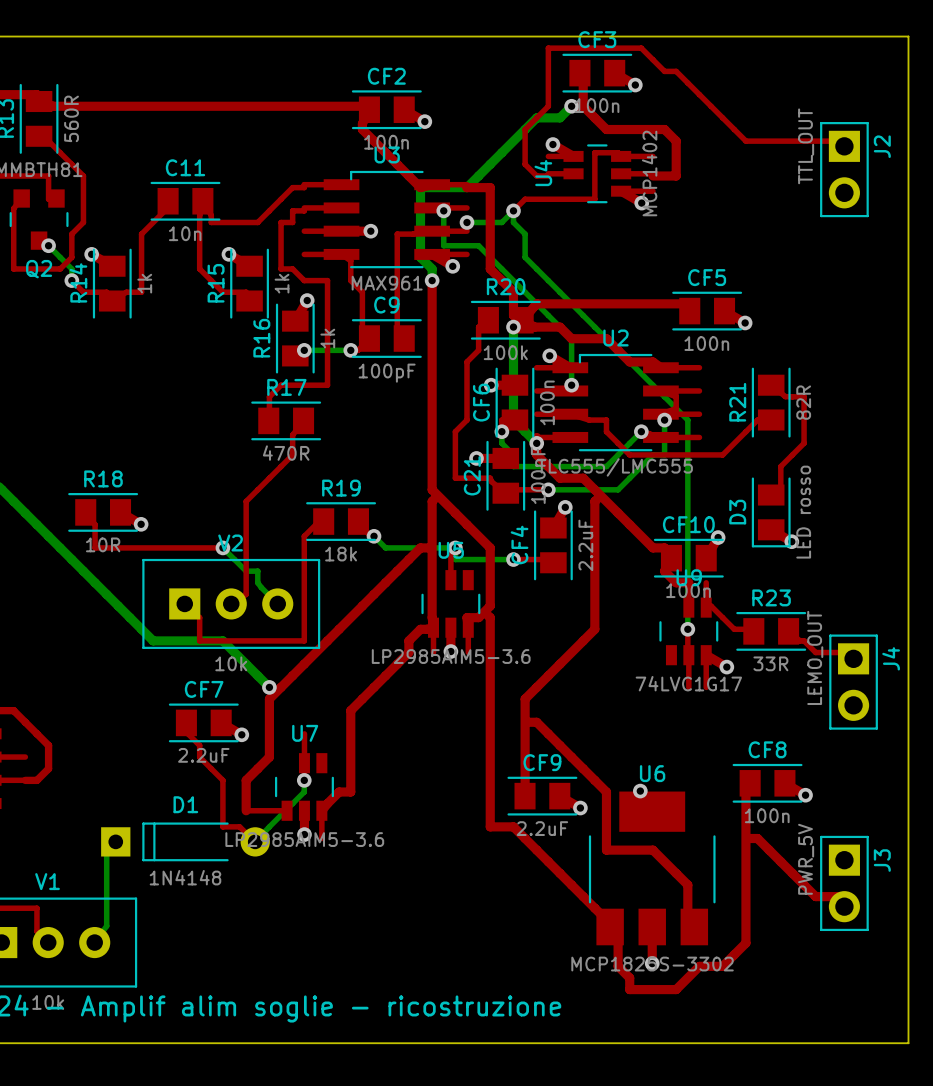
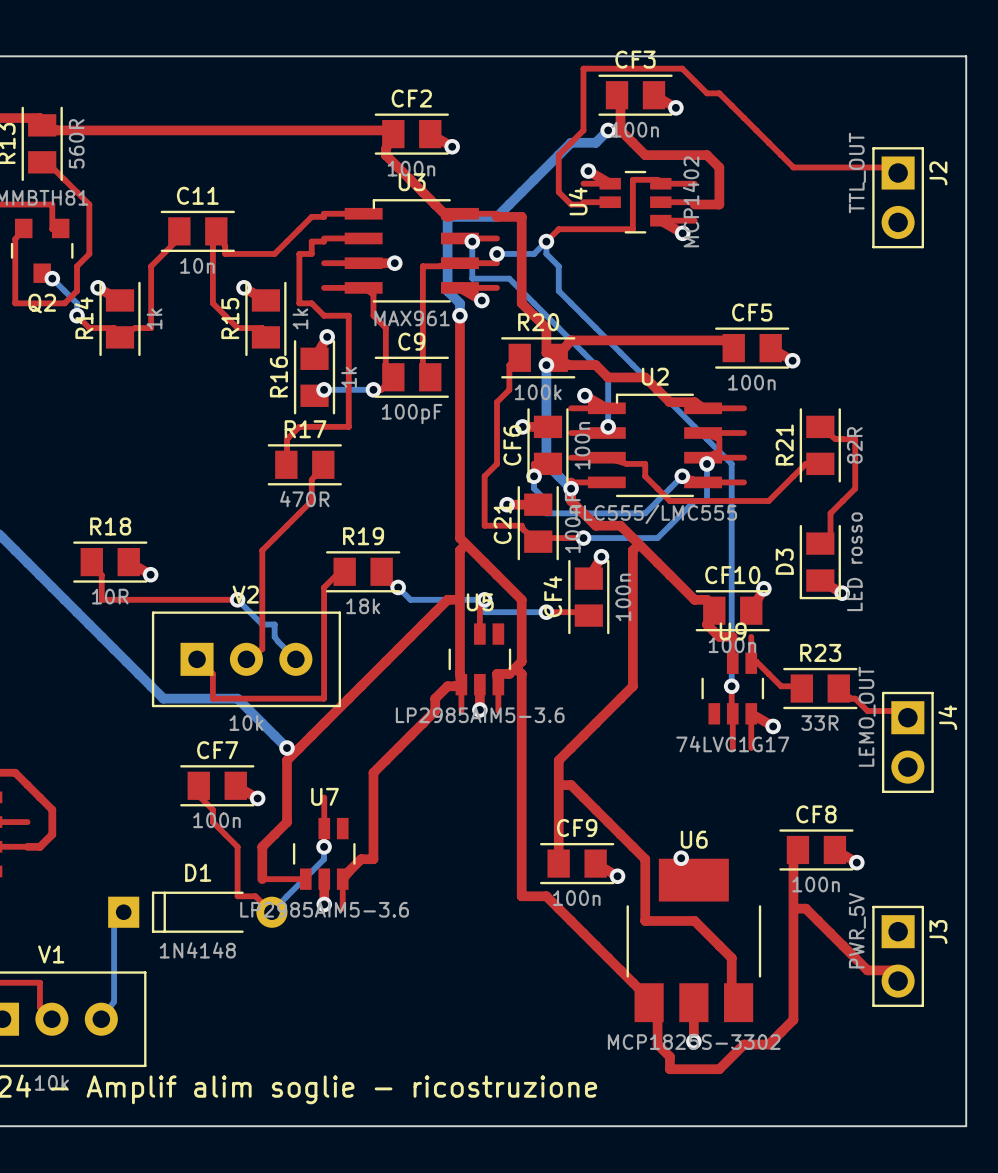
CF4 value: 2.2uF (585, 545) -> 100n (623, 597)
CF7 value: 2.2uF (203, 755) -> 100n (216, 820)
CF9 value: 2.2uF (542, 828) -> 100n (576, 898)

